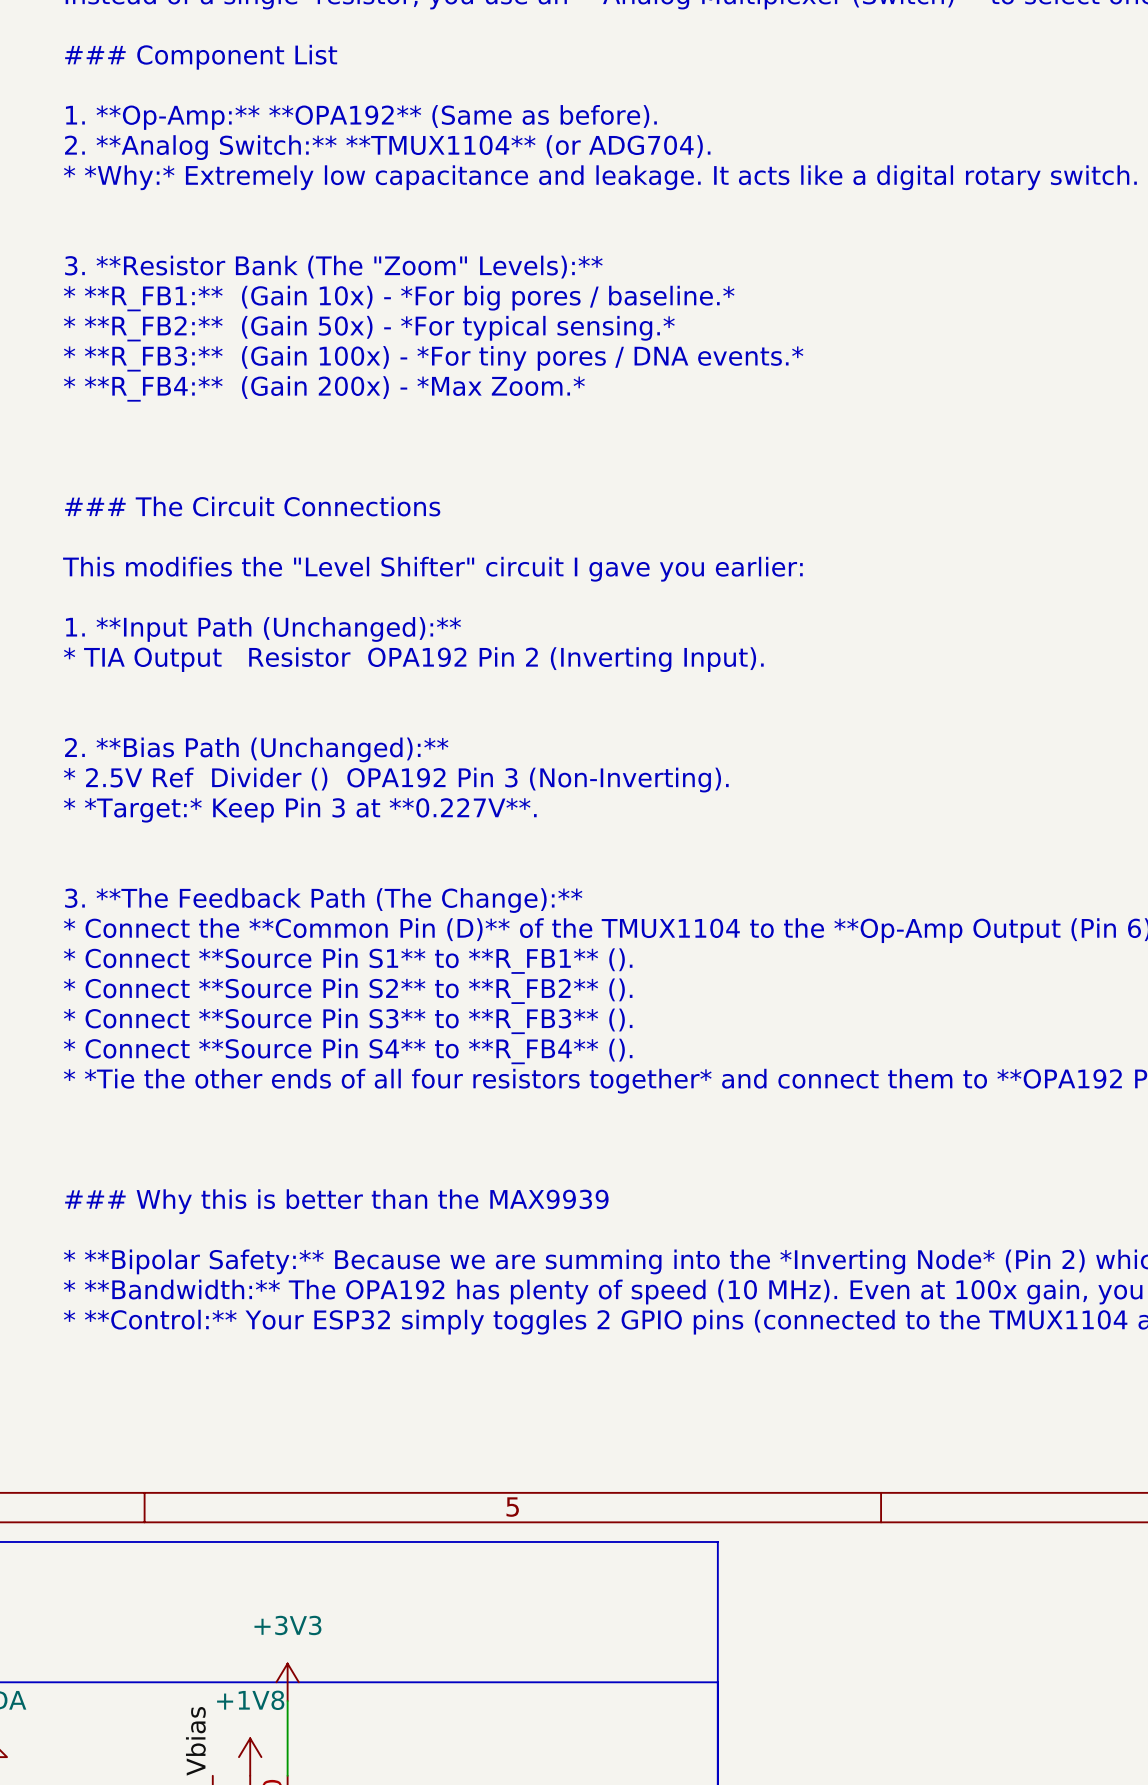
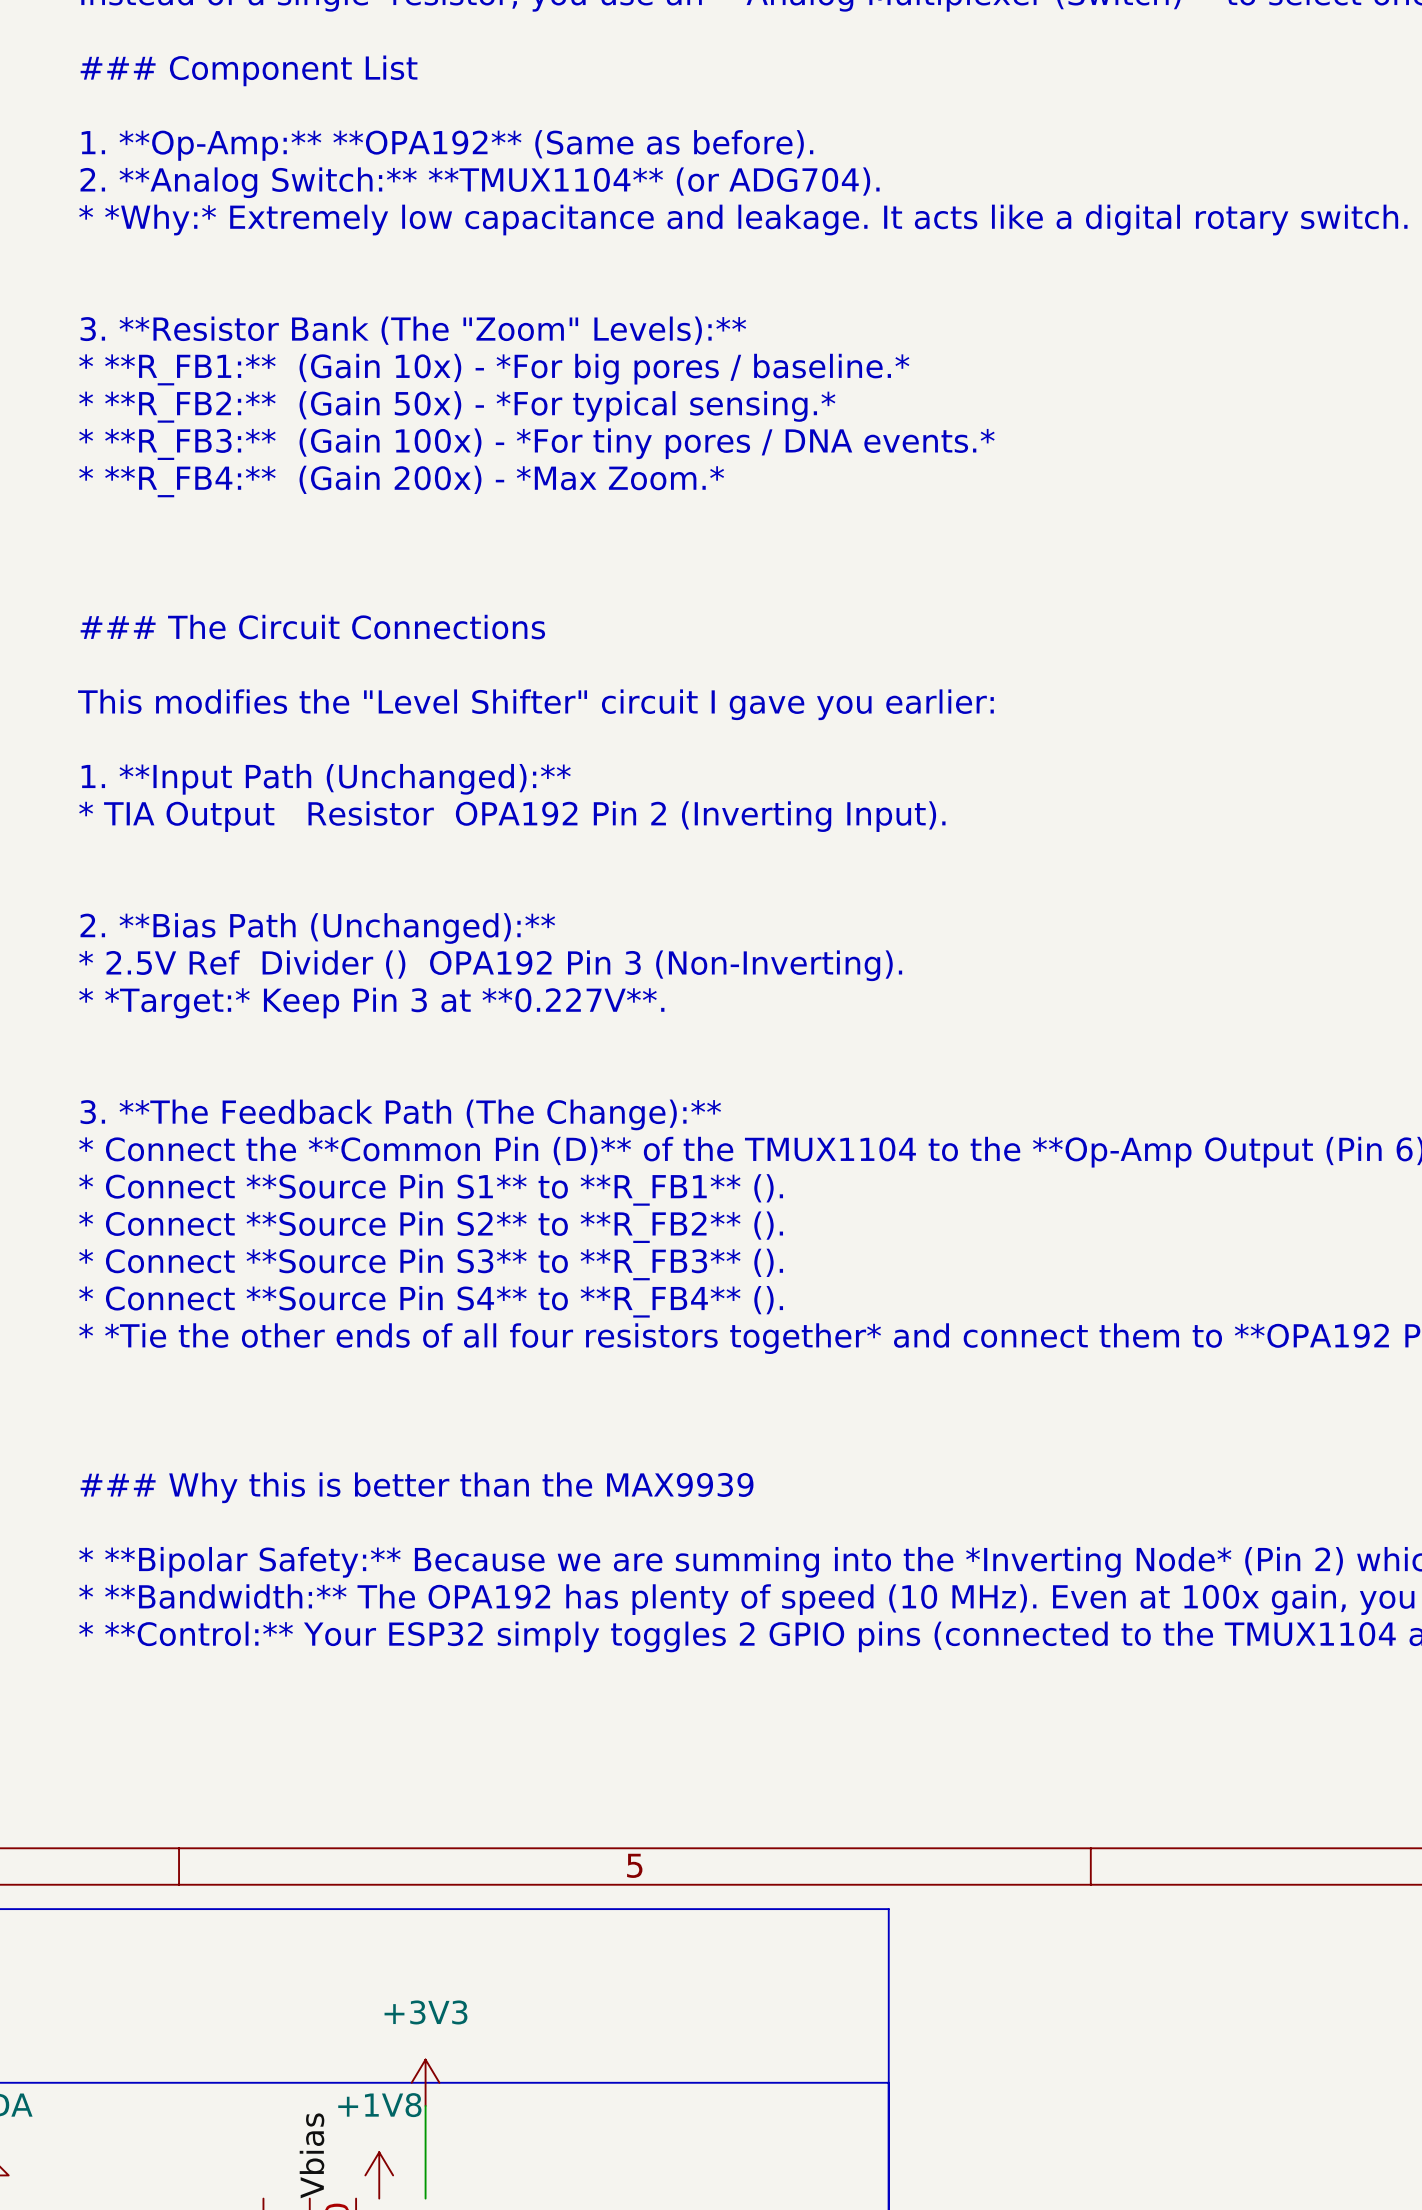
power symbol position: +3V3 (287, 1682) -> +3V3 (425, 2082)
wire: (287, 1700) (287, 1775) -> (425, 2105) (425, 2198)
label position: Vbias (195, 1741) -> Vbias (312, 2155)
power symbol position: +1V8 (250, 1757) -> +1V8 (379, 2175)

